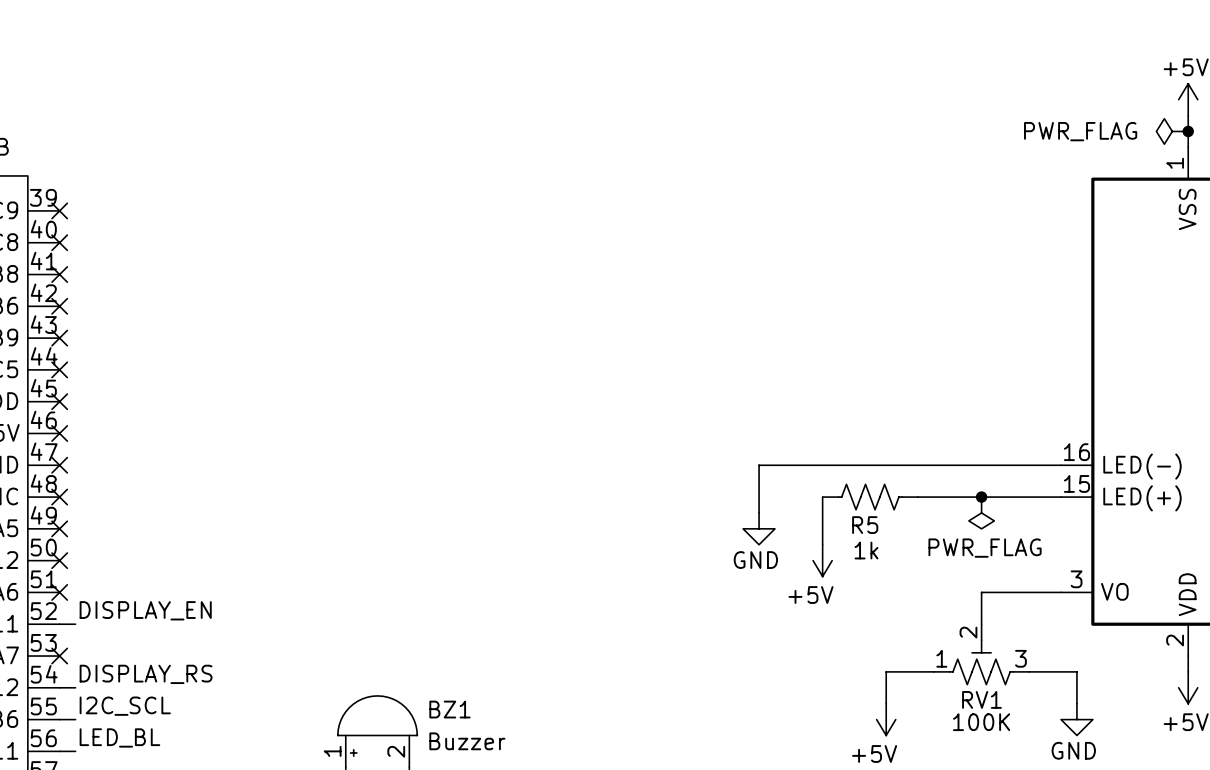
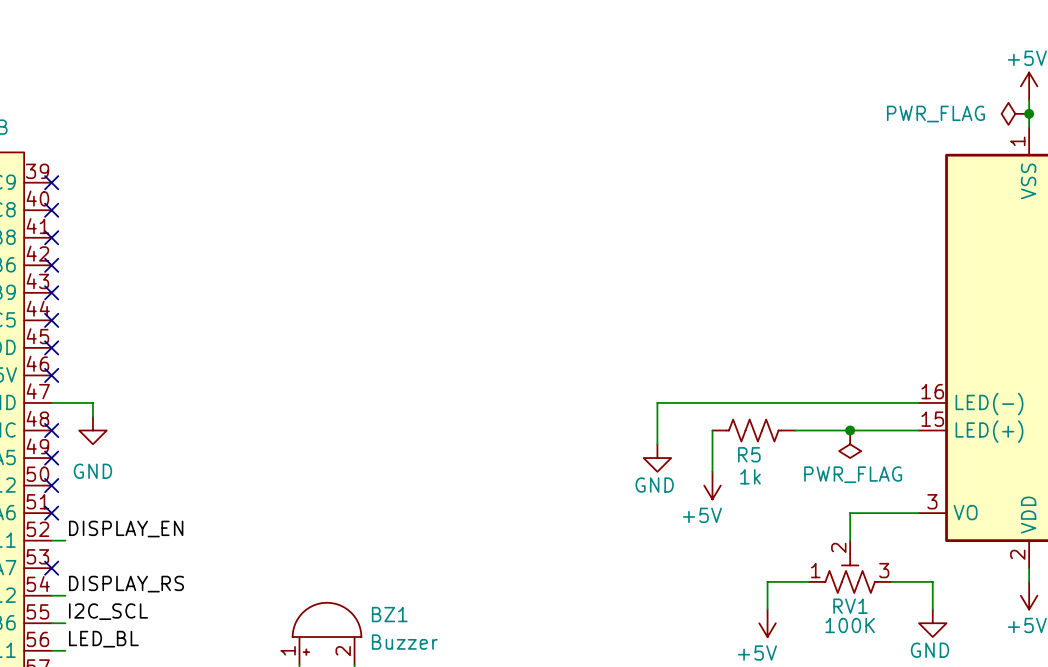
wire: none -> (51, 402) (92, 402) (92, 416)
no-connect mark: (59, 465) -> none
power symbol: none -> GND (92, 430)

